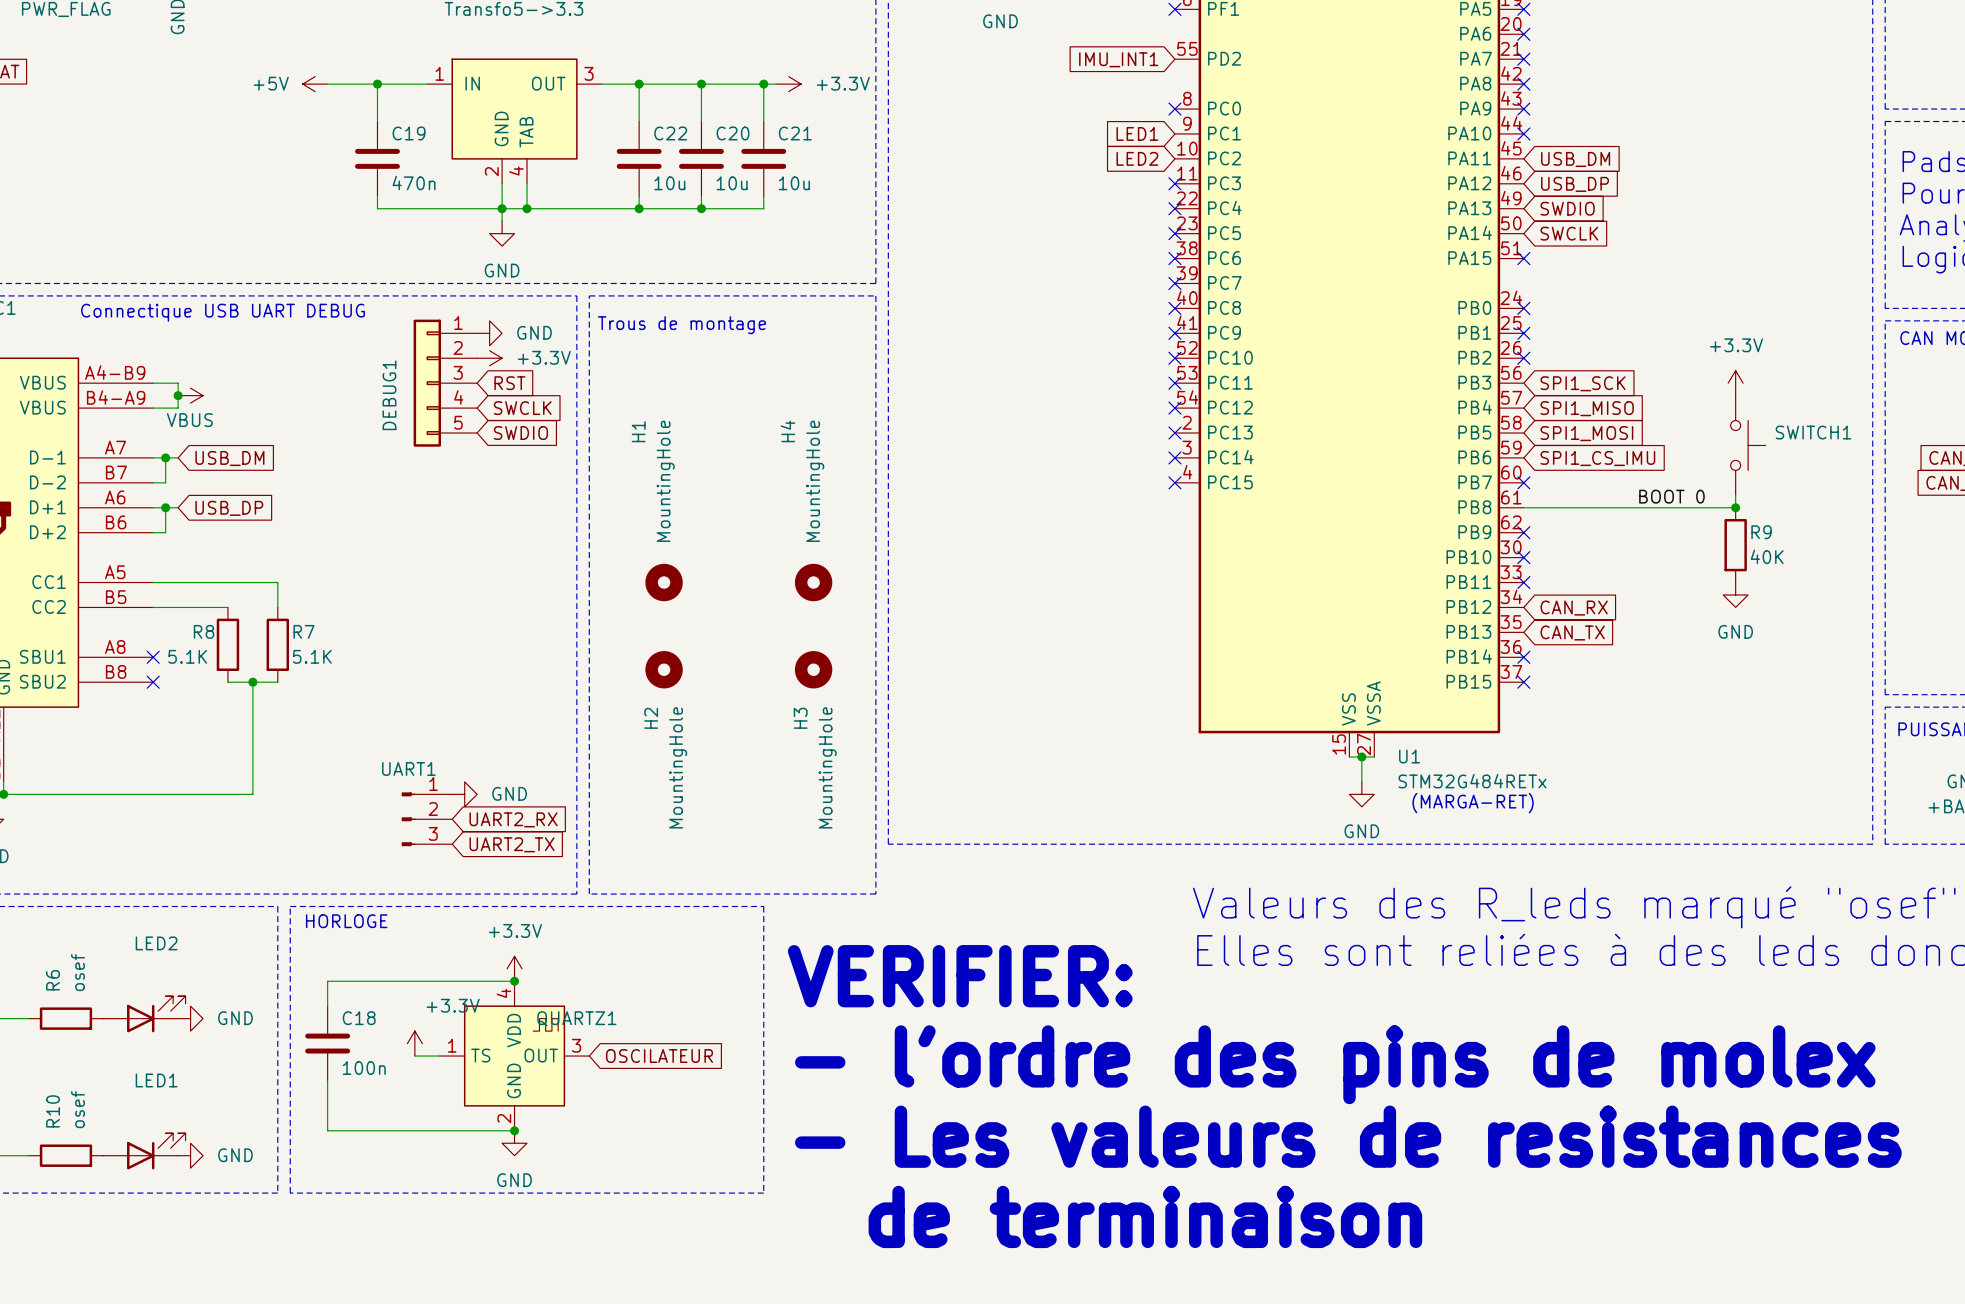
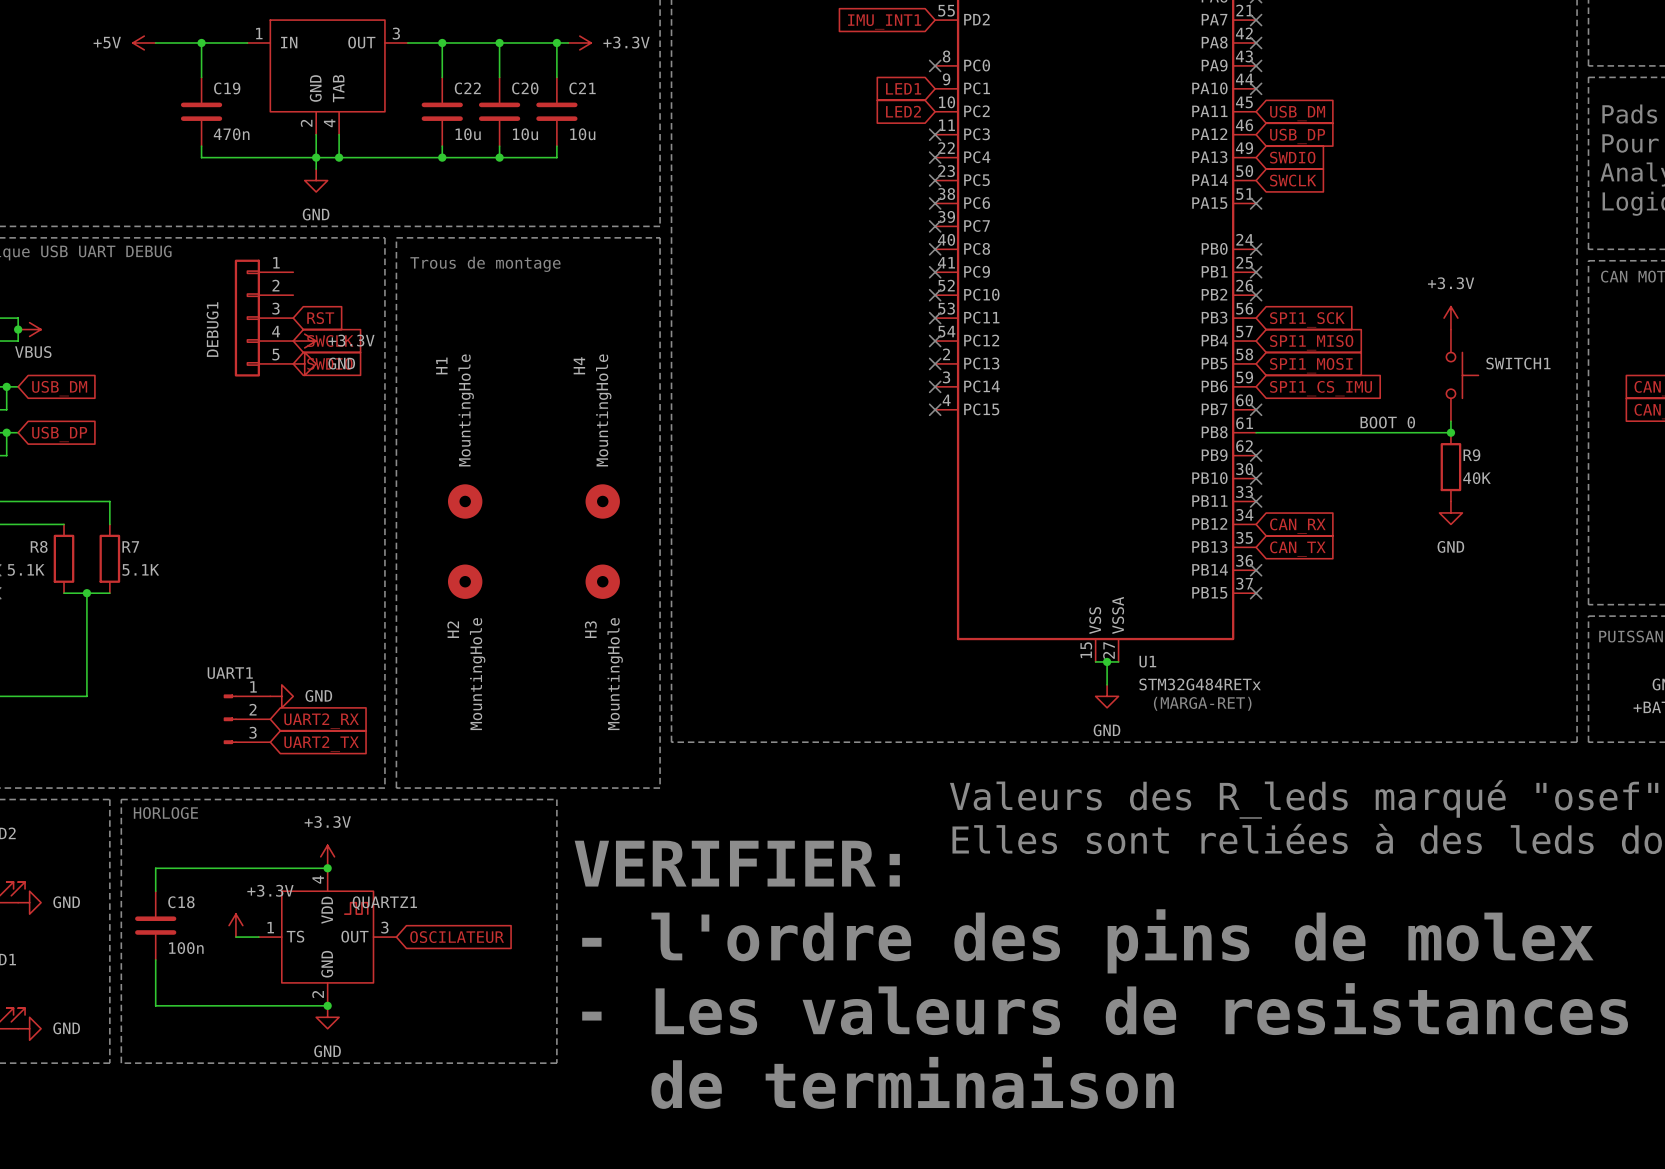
power symbol position: GND (489, 333) -> GND (304, 363)
power symbol position: +3.3V (489, 358) -> +3.3V (304, 341)

